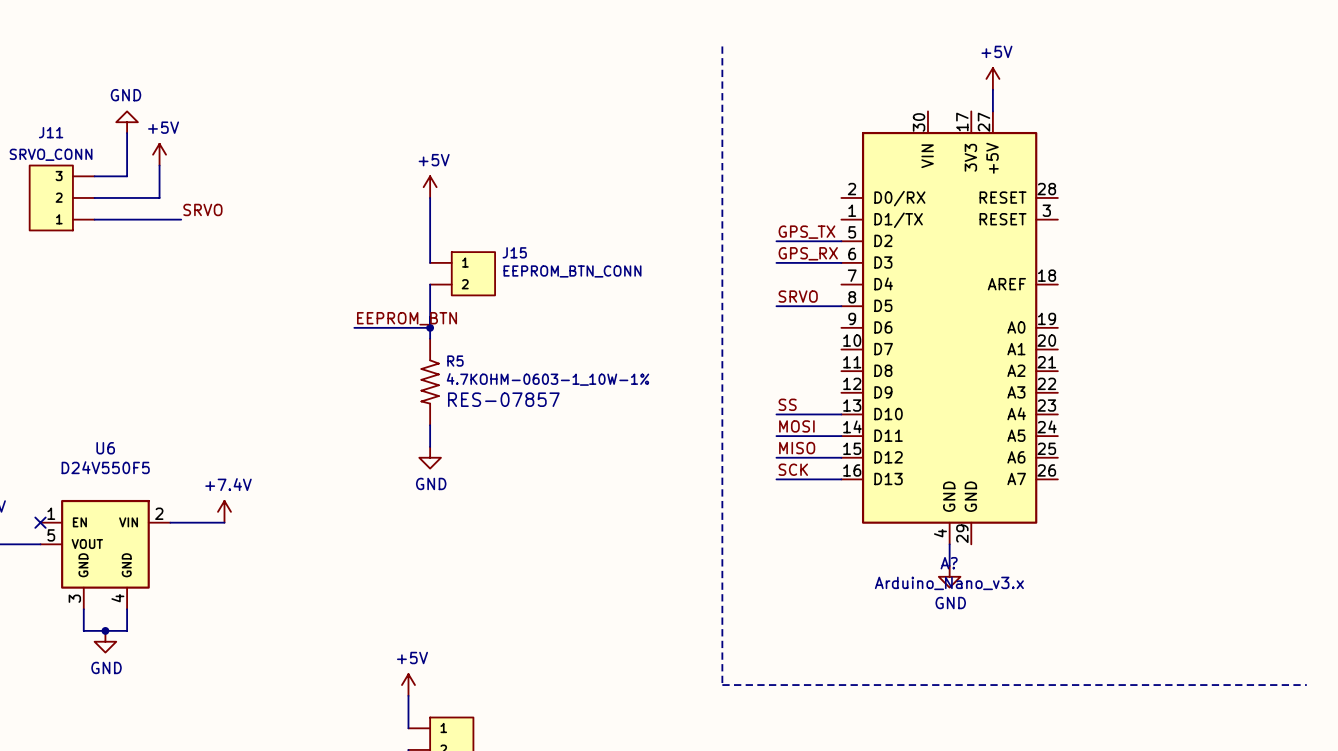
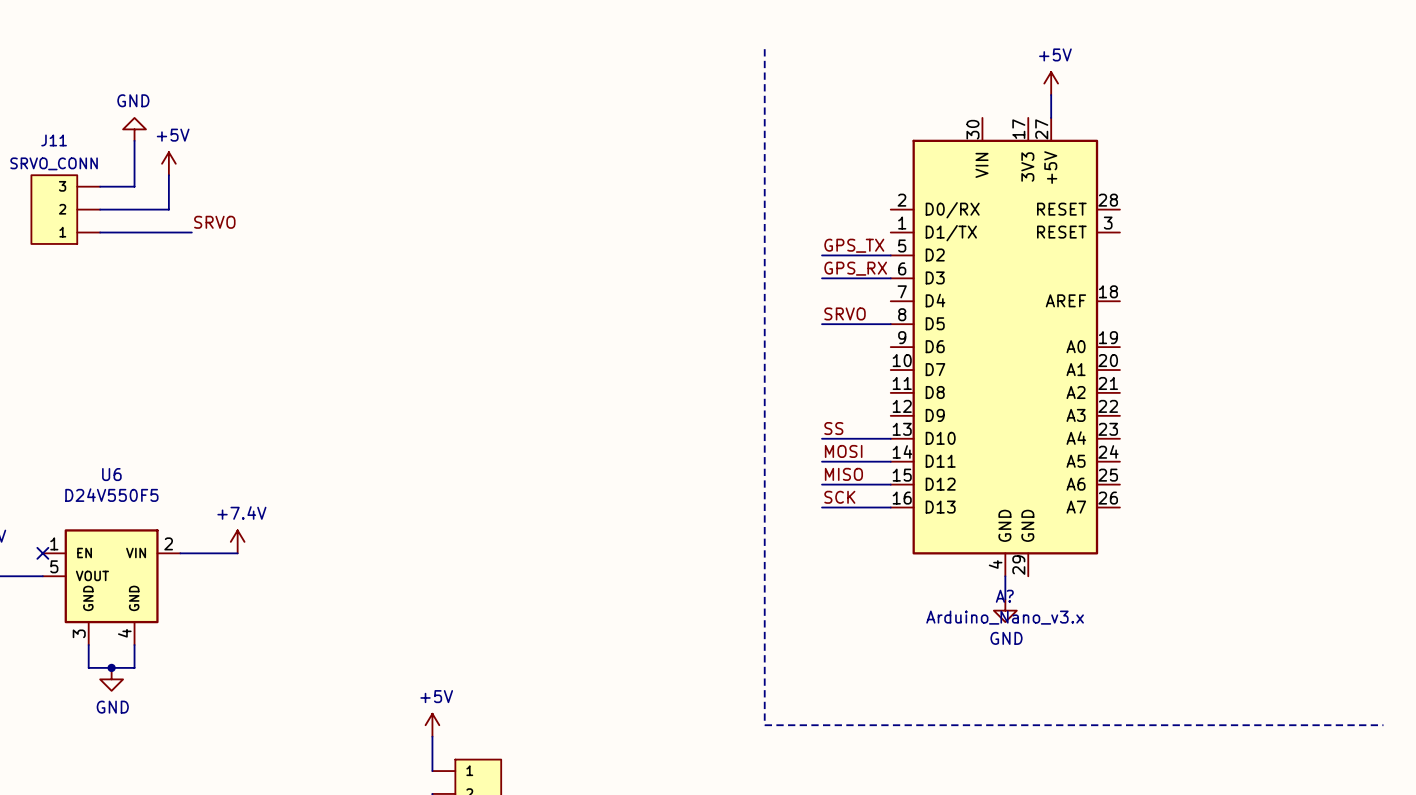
power symbol: +5V (430, 187) -> none
wire: (430, 197) (430, 262) -> none
J15: EEPROM_BTN_CONN (462, 273) -> none
wire: (430, 284) (430, 338) -> none
label: EEPROM_BTN (407, 318) -> none
wire: (354, 327) (430, 327) -> none
junction: (430, 327) -> none
R5: 4.7KOHM-0603-1_10W-1% (430, 381) -> none
wire: (430, 425) (430, 446) -> none
power symbol: GND (430, 457) -> none

